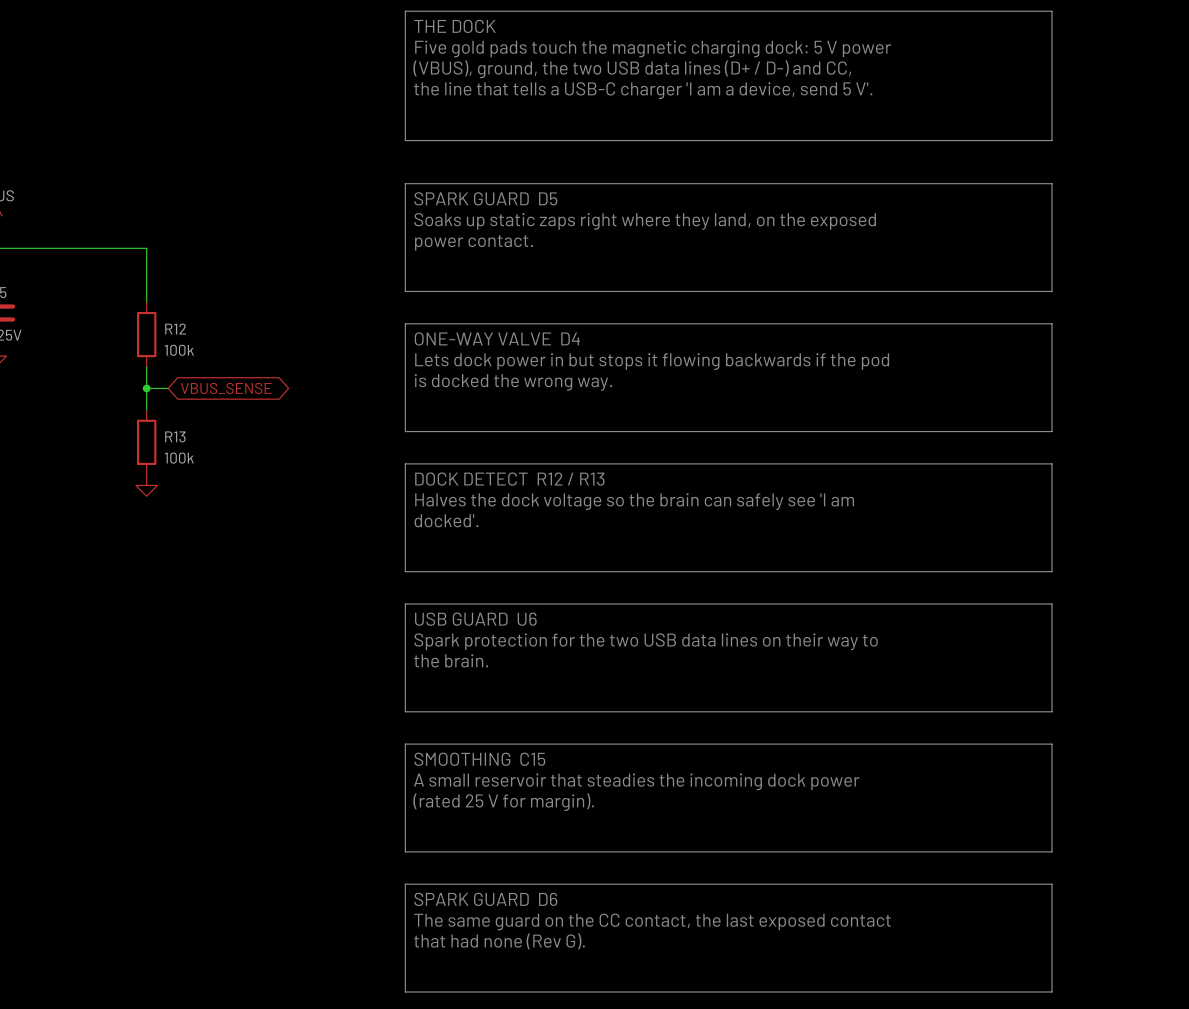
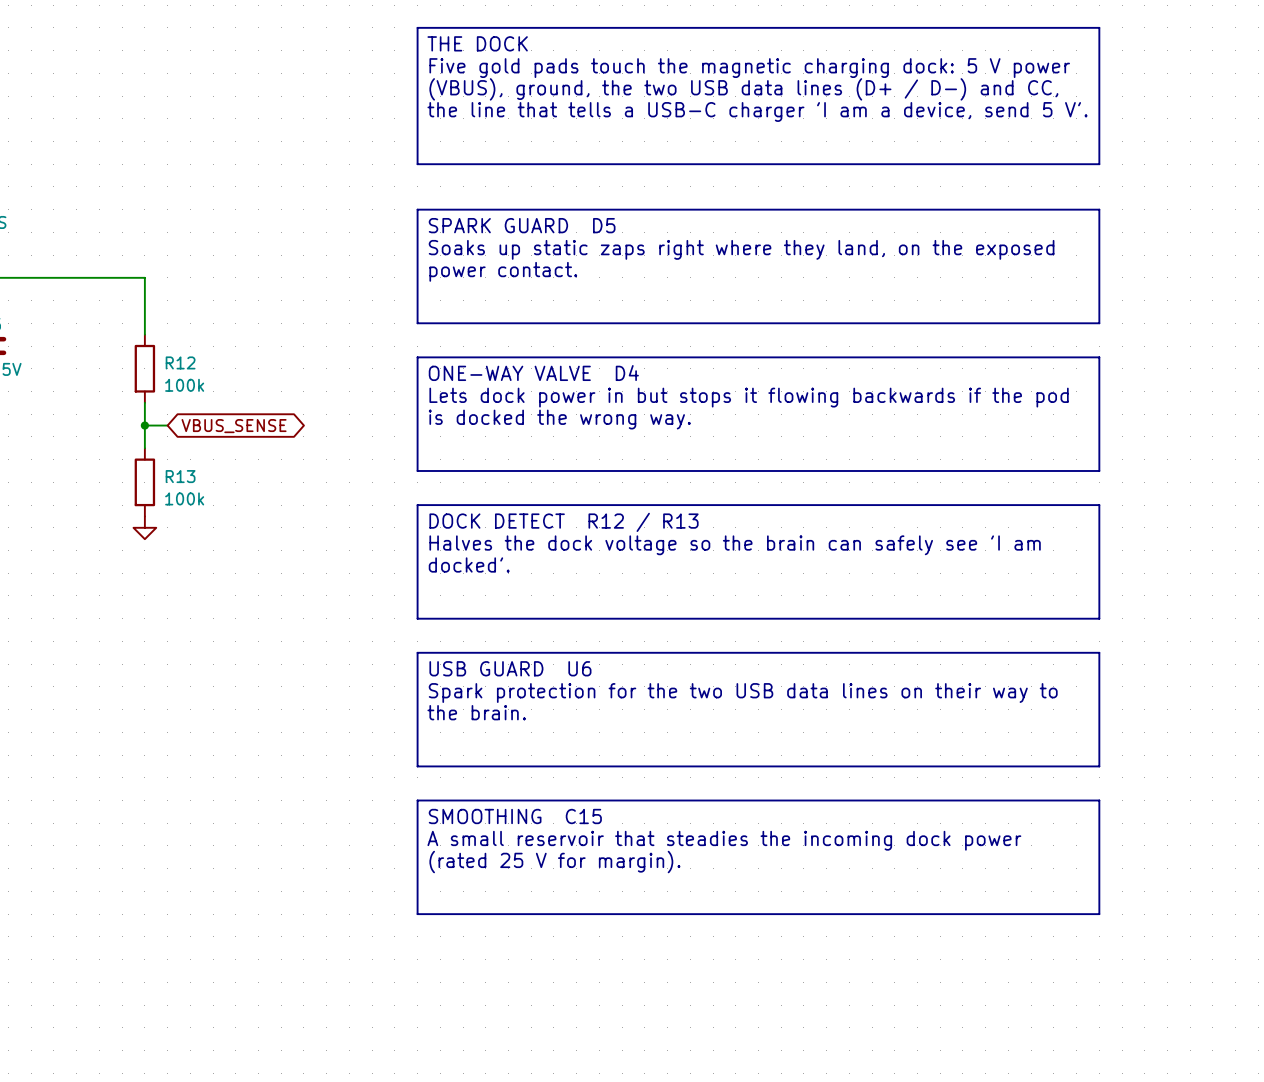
line: (405, 884) (1052, 884) (1052, 992) (405, 992) (405, 884) -> none
text: SPARK GUARD D6 (485, 899) -> none
text: The same guard on the CC contact, the last exposed contact (652, 921) -> none
text: that had none (Rev G). (499, 941) -> none

